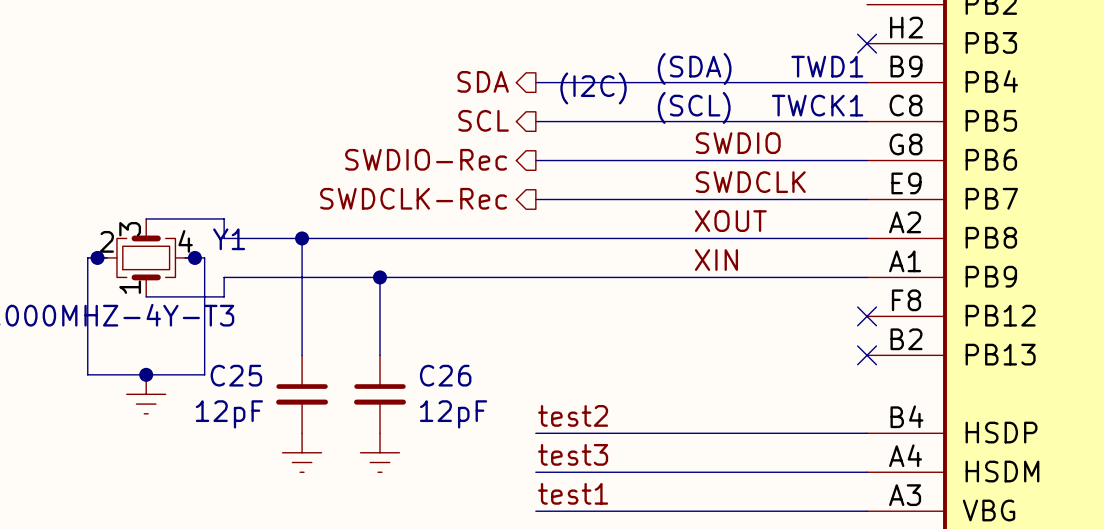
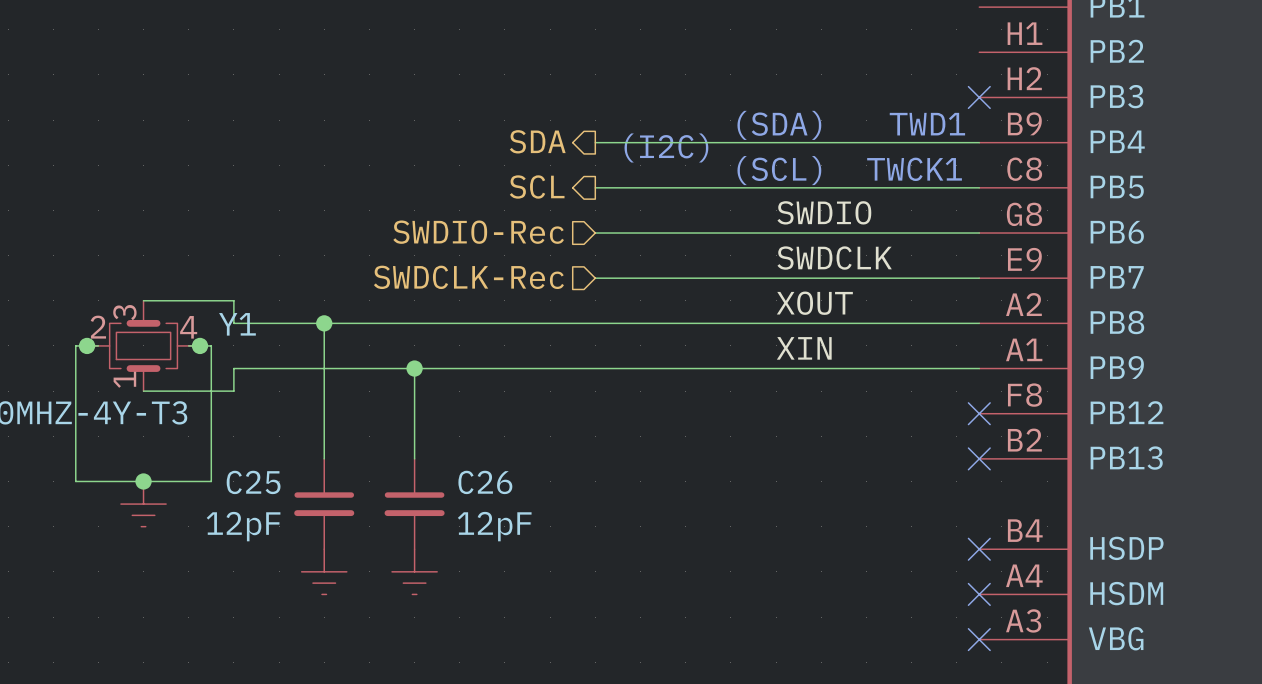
hierarchical label shape: output (426, 159) -> input (478, 232)
hierarchical label shape: output (413, 198) -> input (468, 277)
label: test2 (573, 415) -> none
wire: (535, 433) (867, 433) -> none
no-connect mark: none -> (979, 549)
label: test3 (573, 454) -> none
wire: (535, 472) (867, 472) -> none
no-connect mark: none -> (979, 594)
label: test1 (573, 493) -> none
wire: (535, 511) (867, 511) -> none
no-connect mark: none -> (979, 639)

